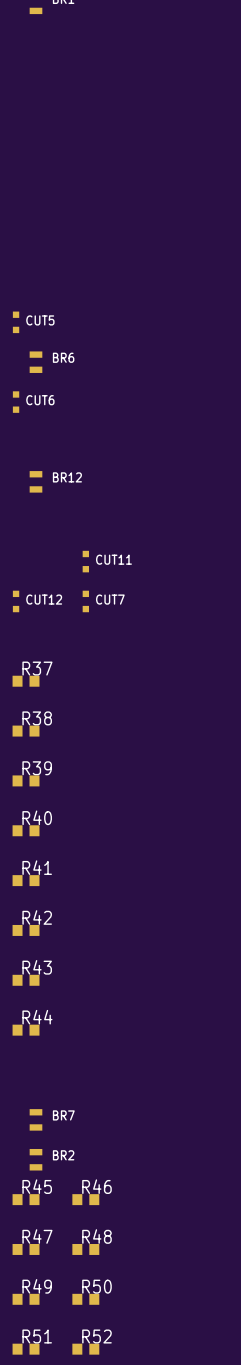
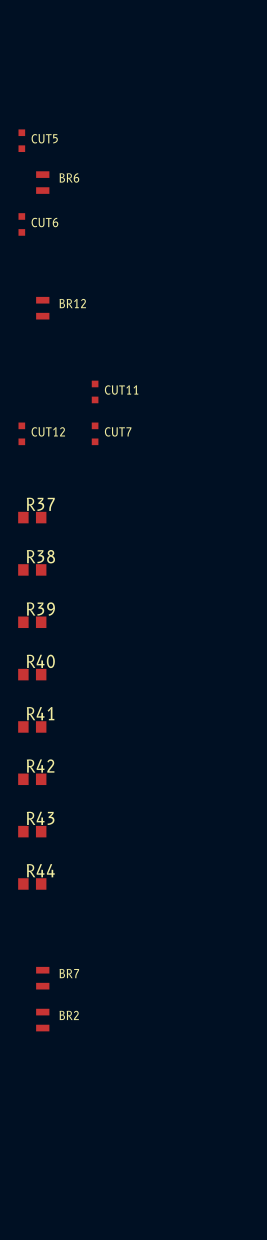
R45: (26, 1199) -> none
R46: (85, 1199) -> none
R47: (26, 1249) -> none
R48: (85, 1249) -> none
R49: (26, 1299) -> none
R50: (85, 1299) -> none
R51: (26, 1349) -> none
R52: (85, 1349) -> none

